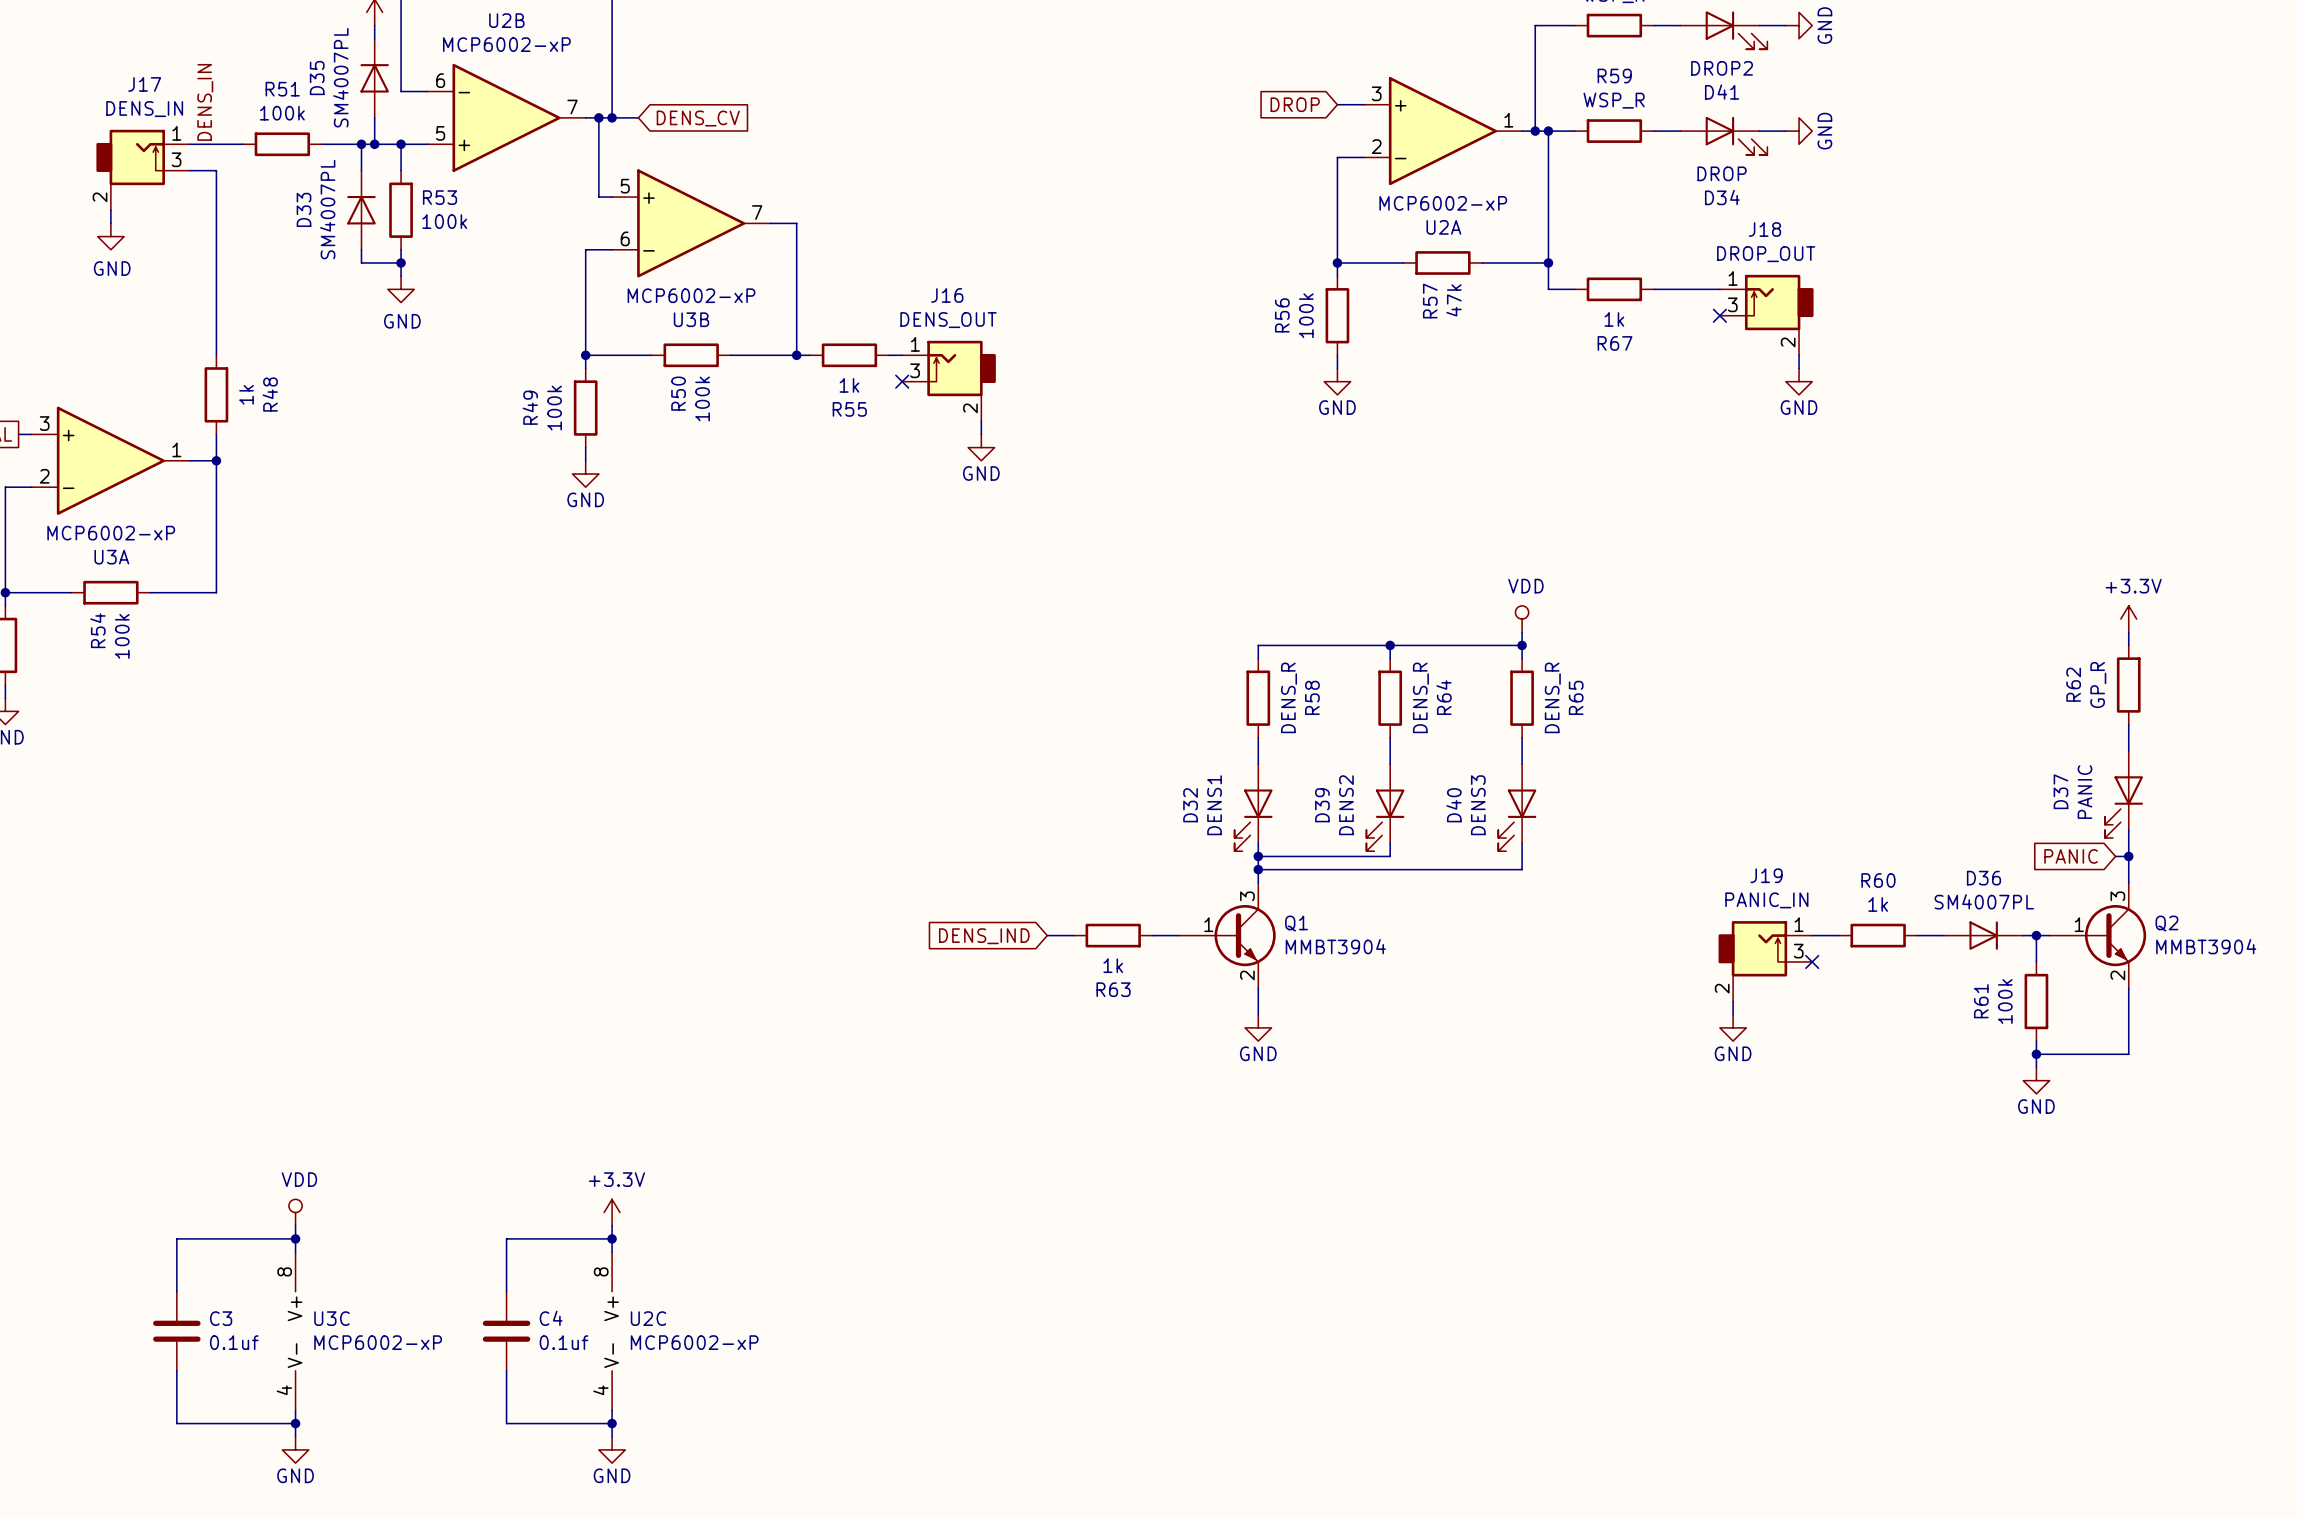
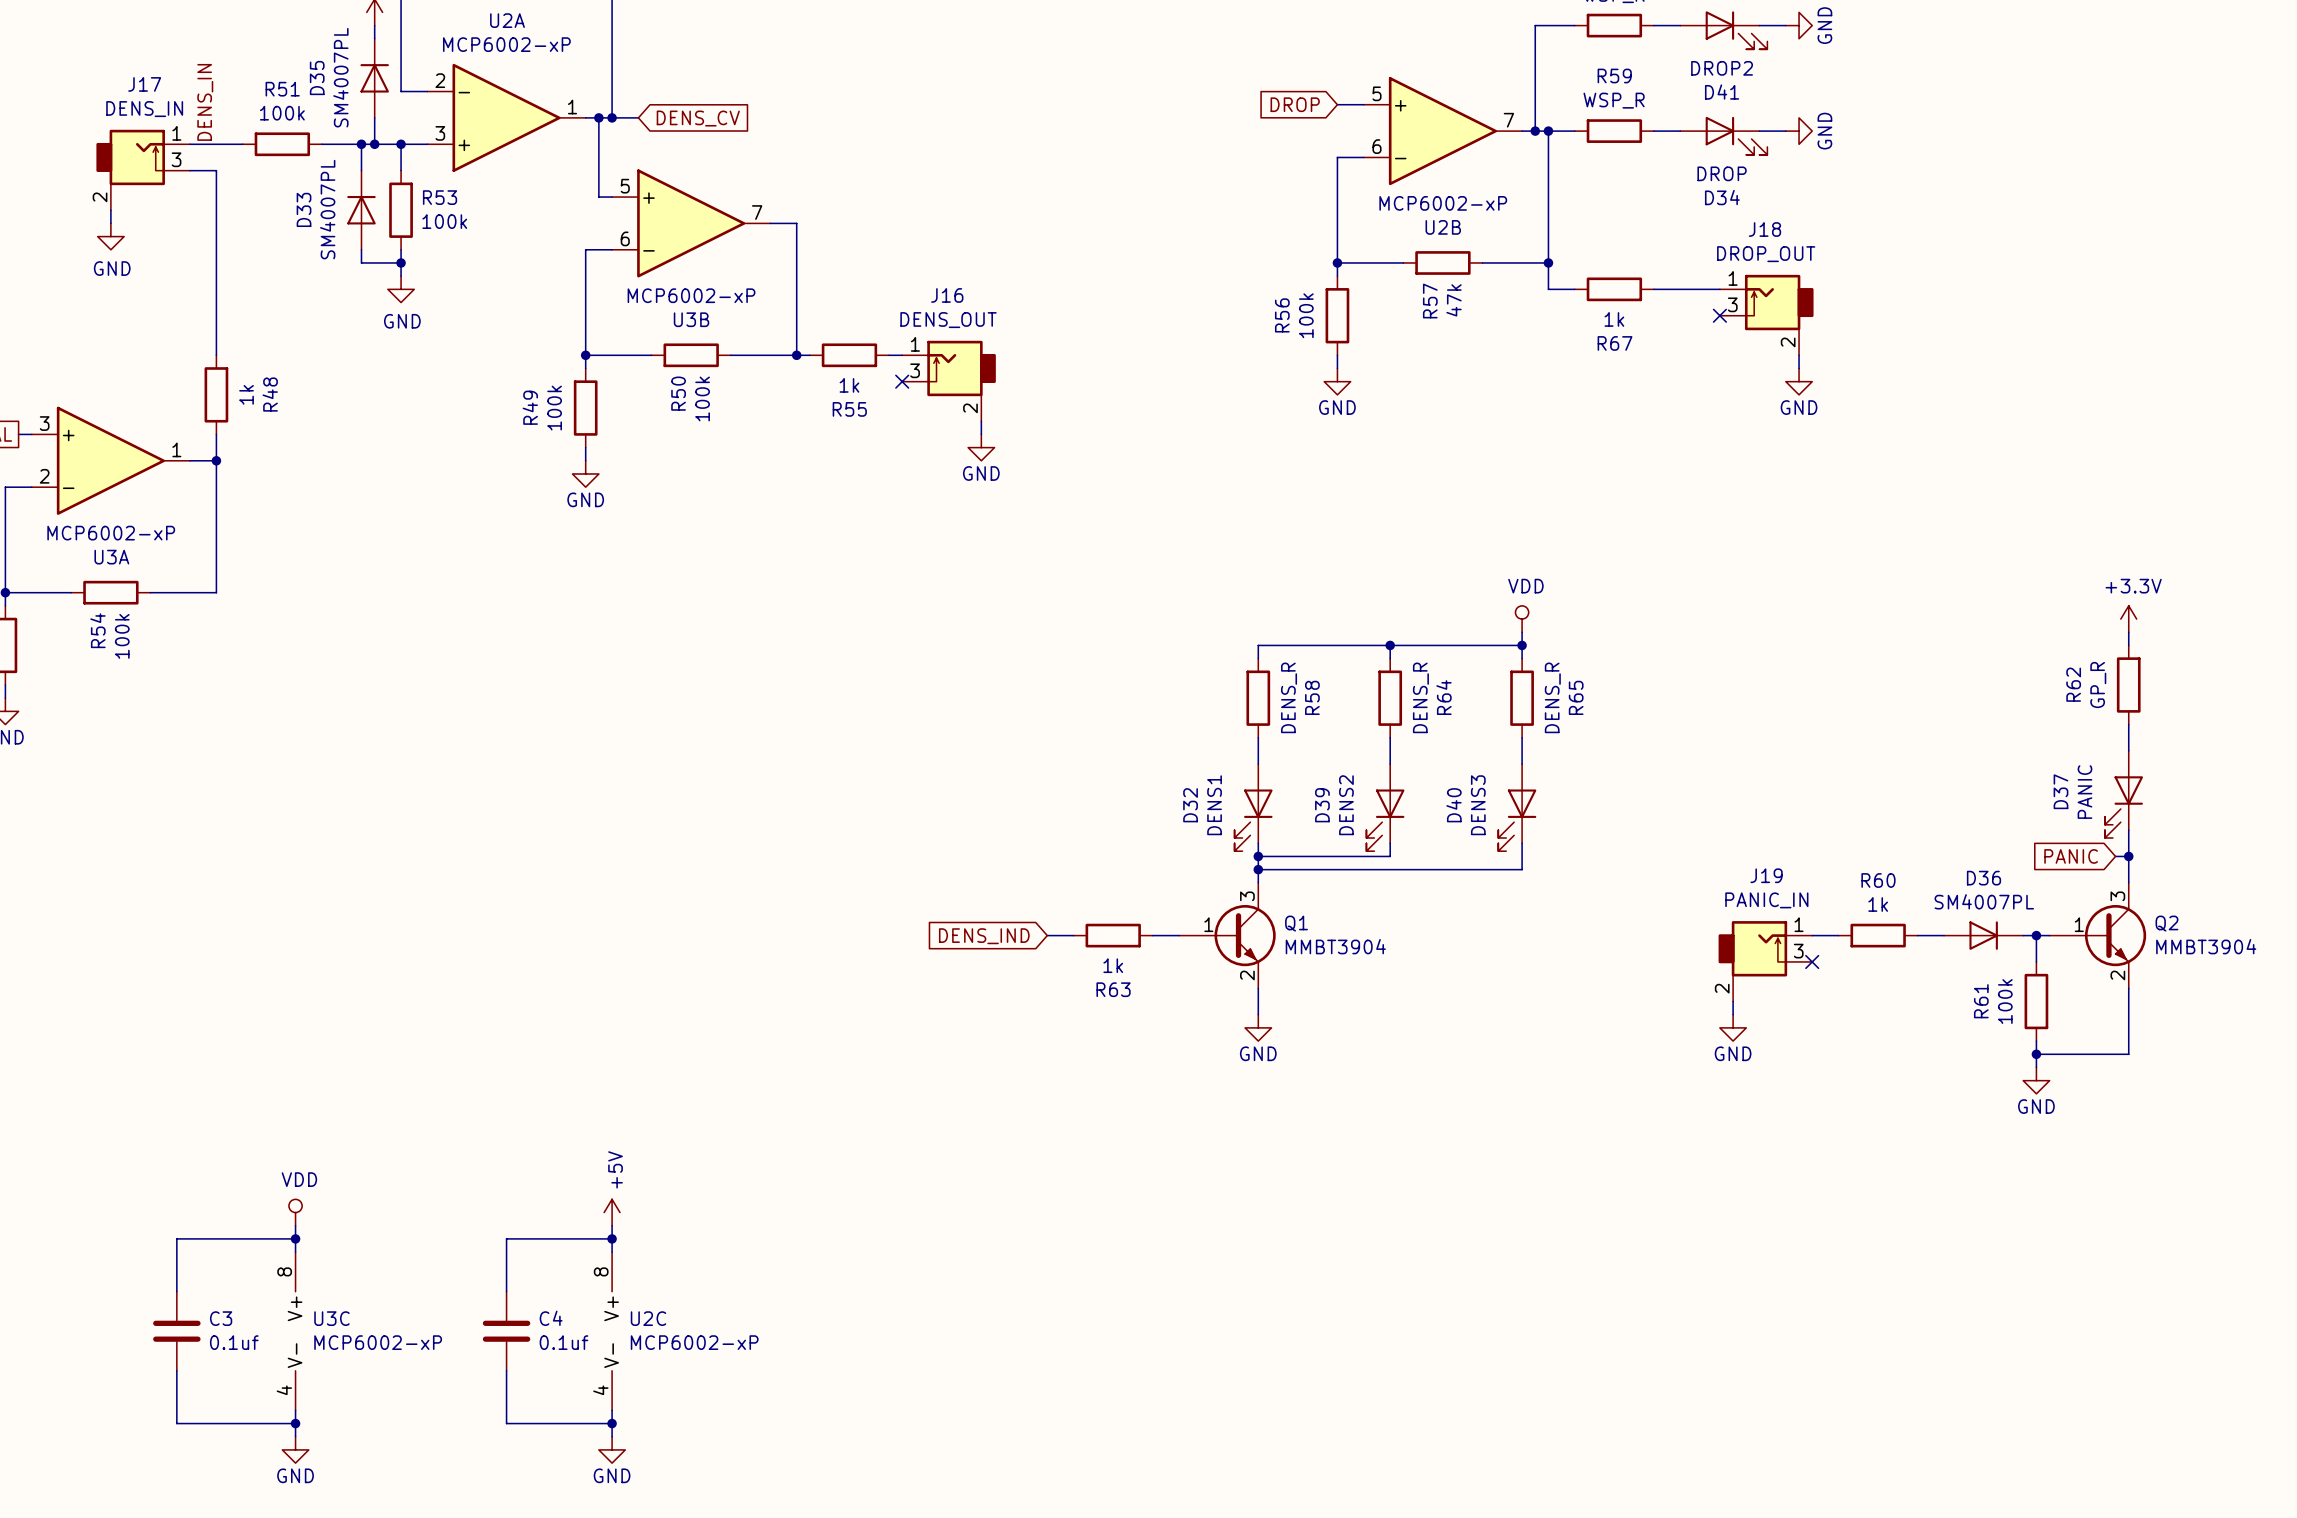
U2B flip: as is (506, 117) -> up-down (1442, 131)
U2B position: (506, 117) -> (1442, 131)
U2A flip: as is (1442, 131) -> up-down (506, 117)
U2A position: (1442, 131) -> (506, 117)
power symbol: +3.3V (612, 1212) -> +5V (612, 1212)

